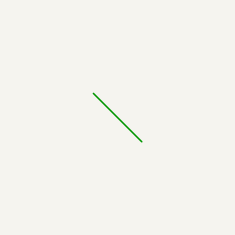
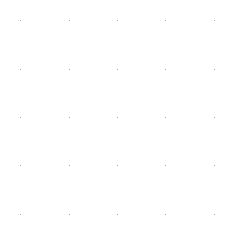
wire: (93, 93) (141, 141) -> none

